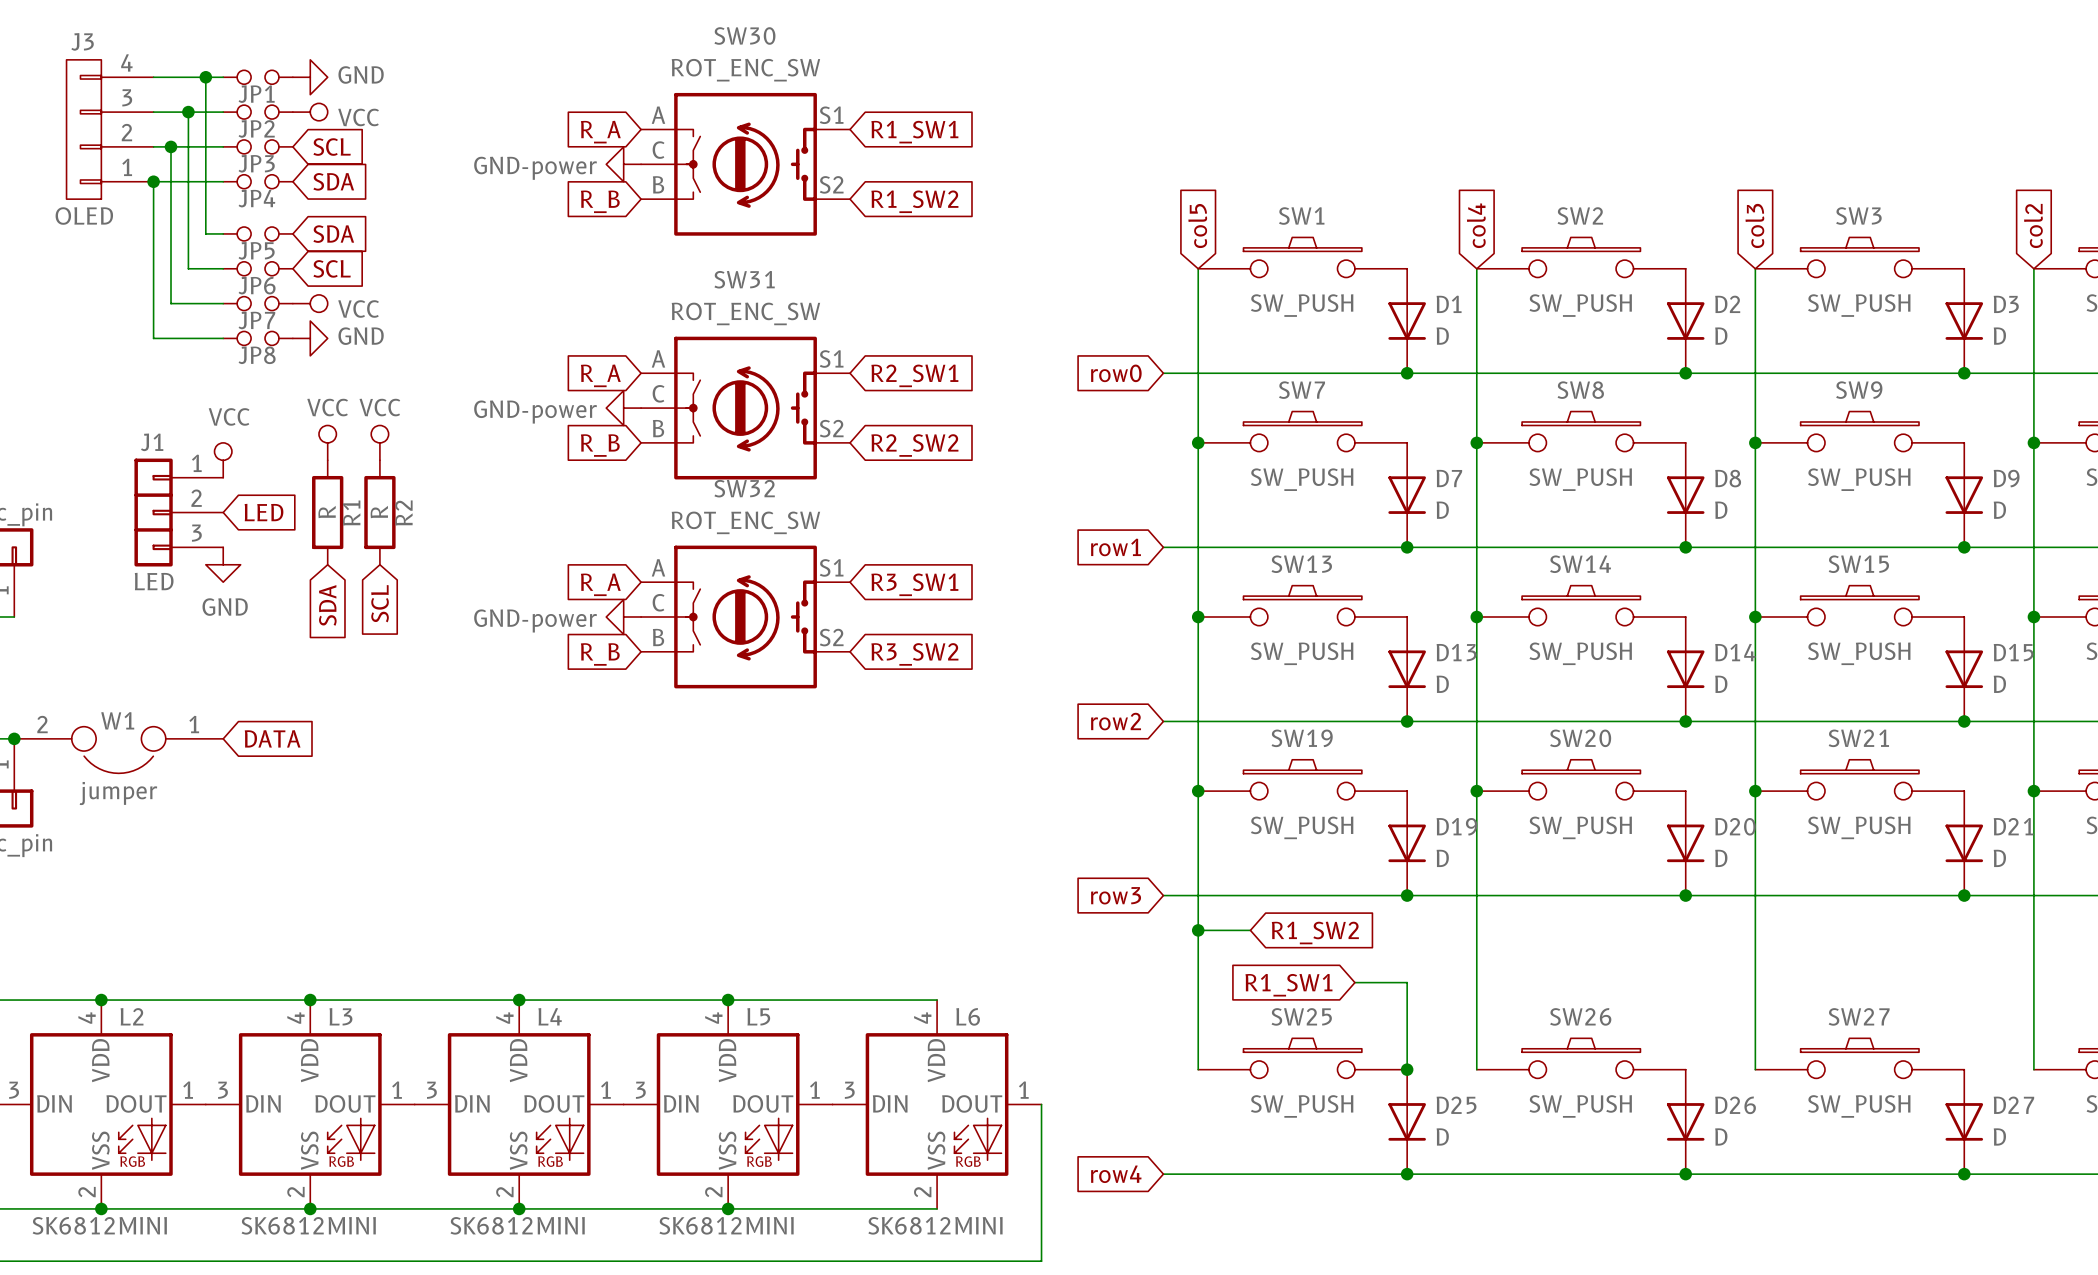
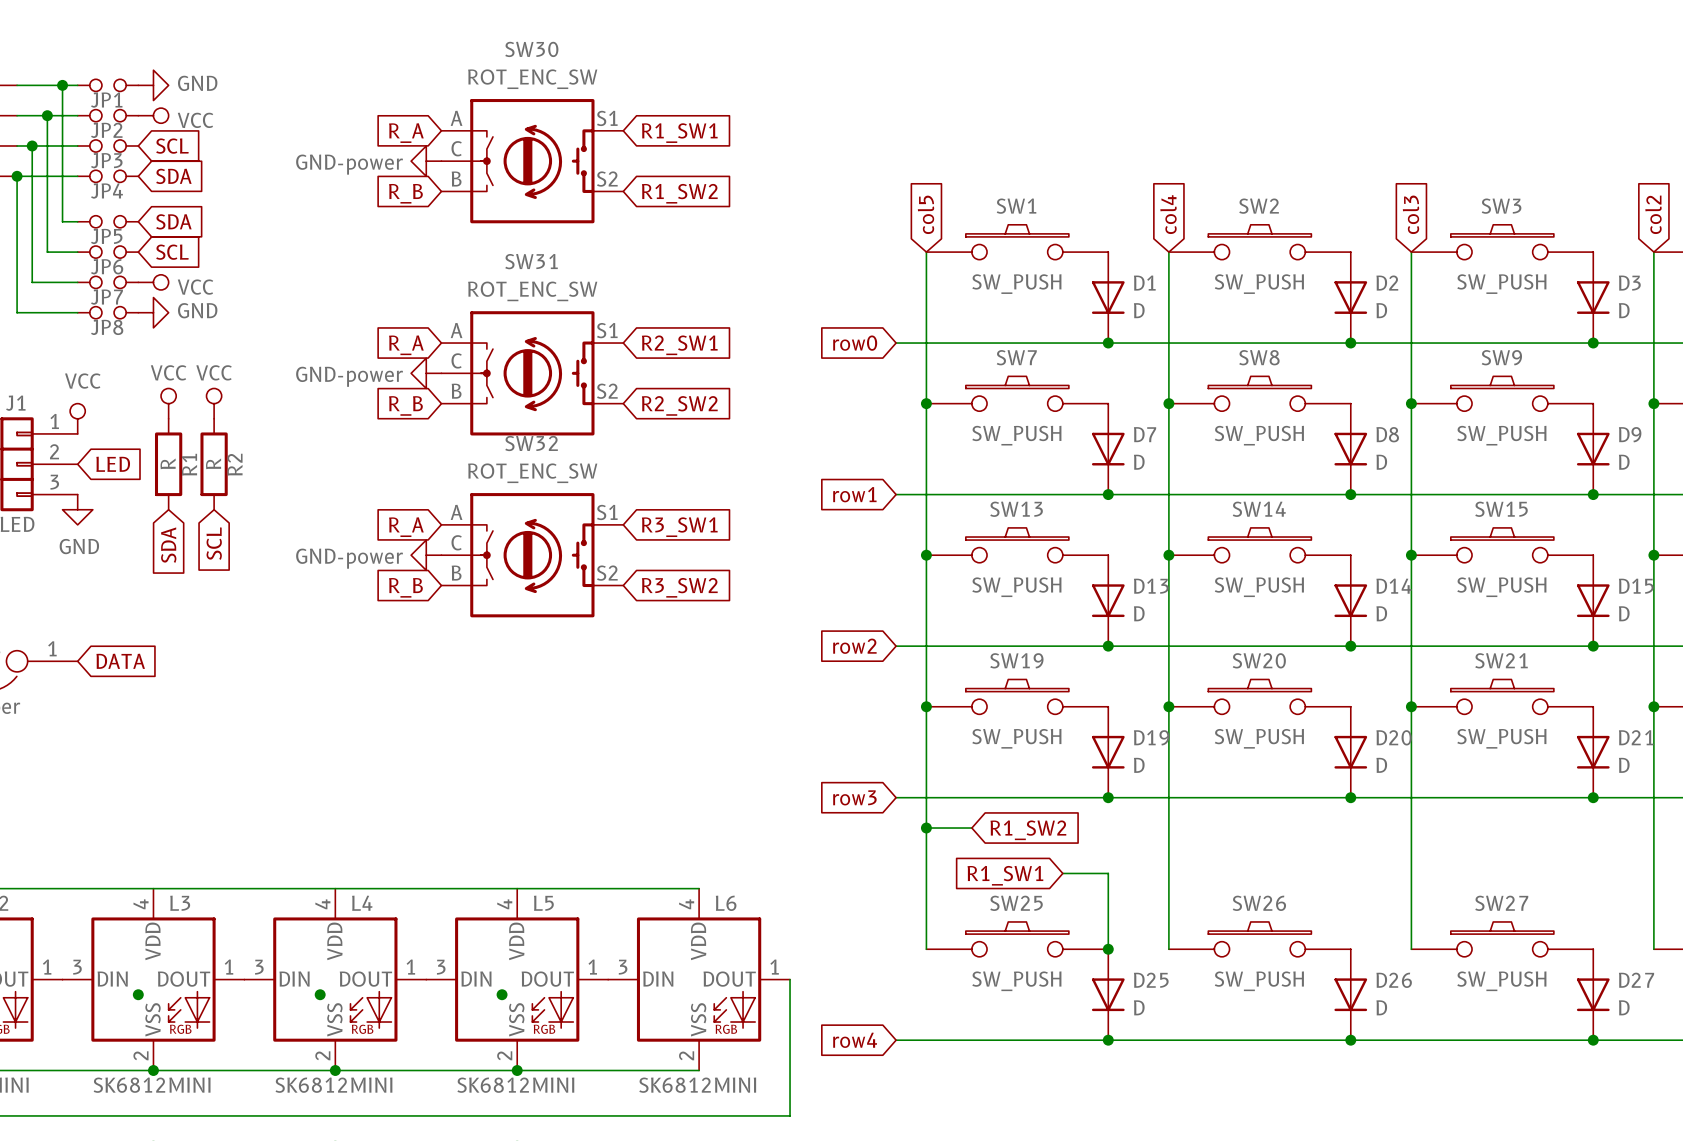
junction: (310, 1000) -> none
junction: (519, 1000) -> none
junction: (728, 1000) -> none
junction: none -> (138, 994)
junction: none -> (320, 994)
junction: none -> (502, 994)

